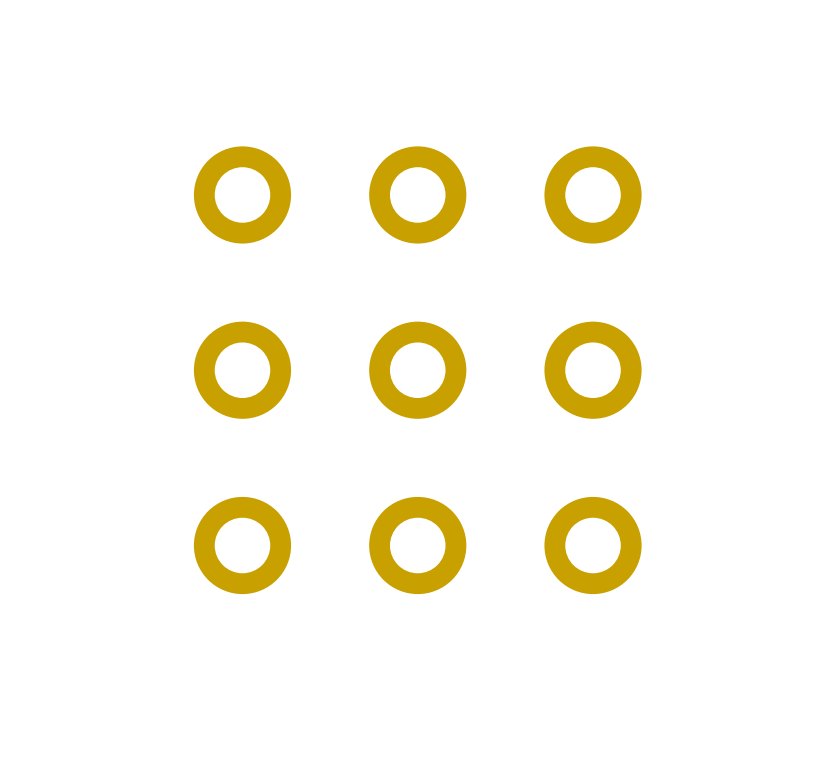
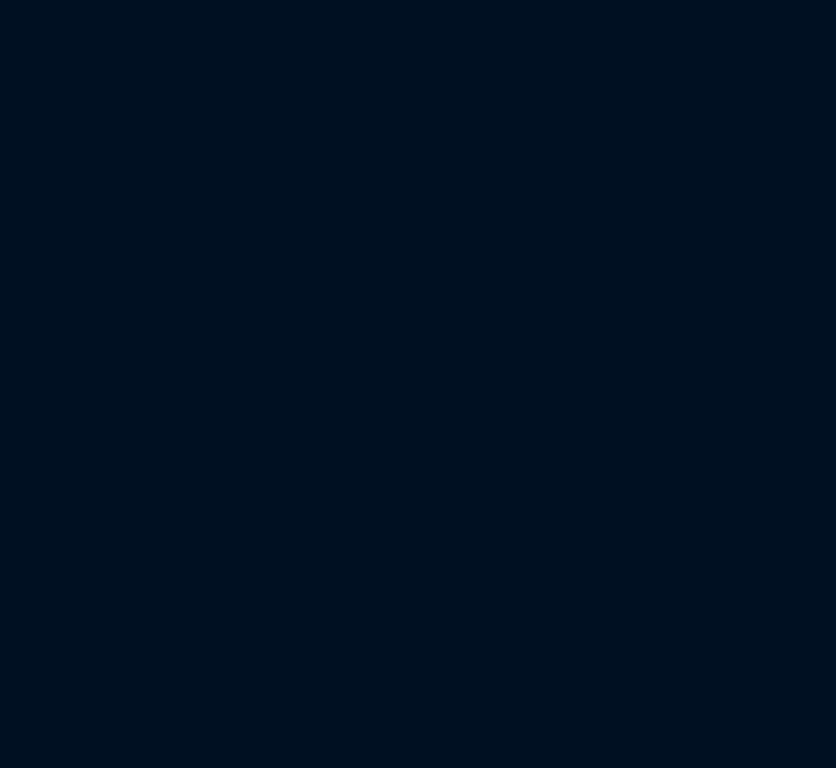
part: (242, 194) -> none
part: (417, 194) -> none
part: (593, 194) -> none
part: (242, 370) -> none
part: (417, 370) -> none
part: (593, 370) -> none
part: (242, 545) -> none
part: (417, 545) -> none
part: (593, 545) -> none

